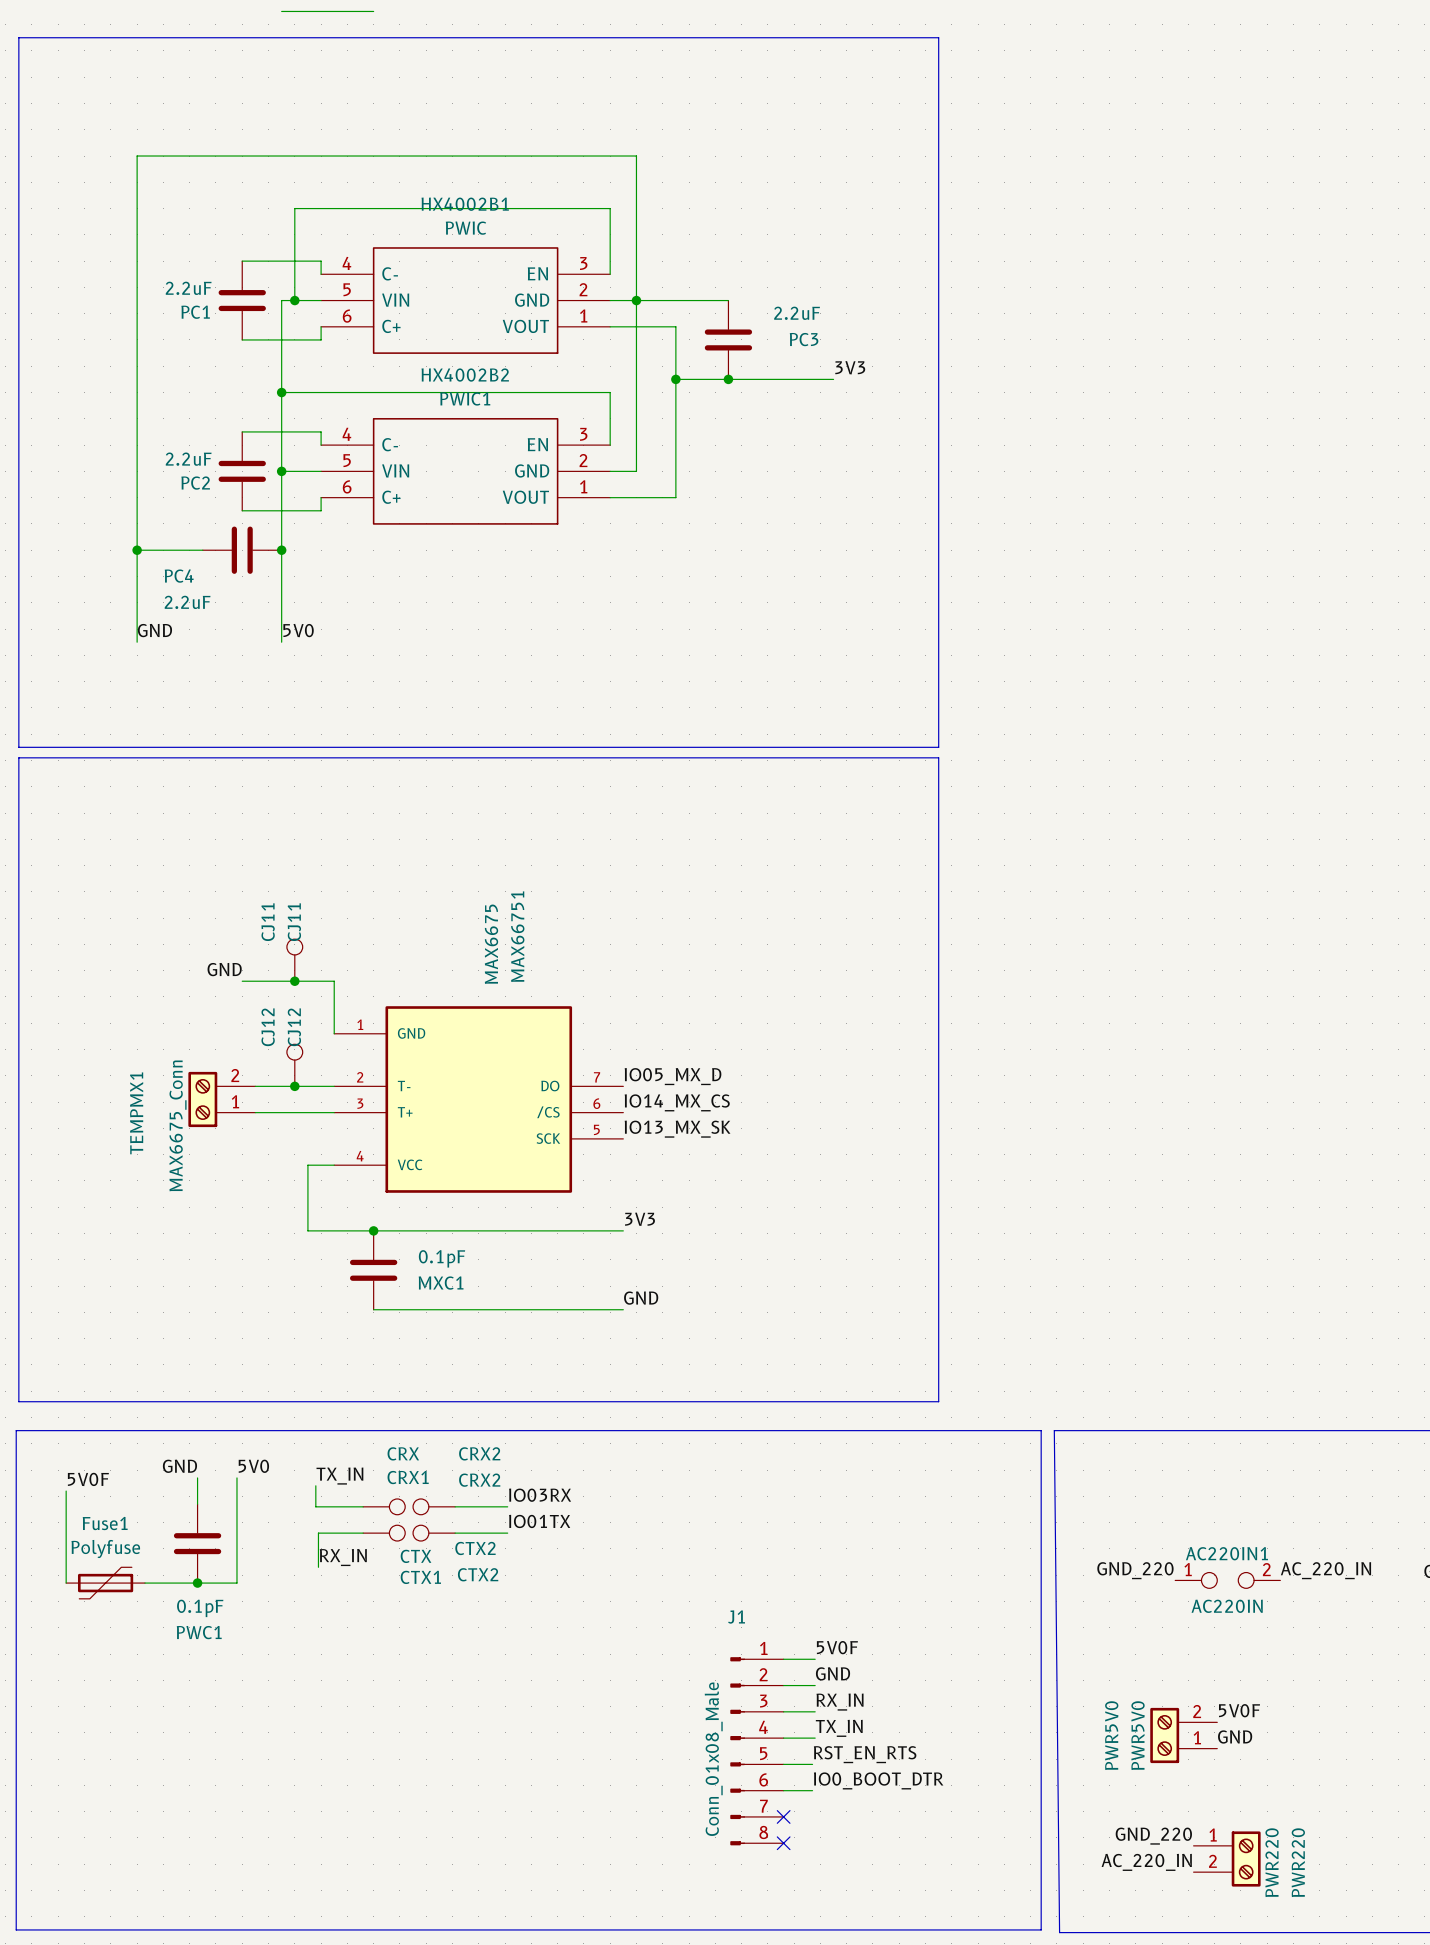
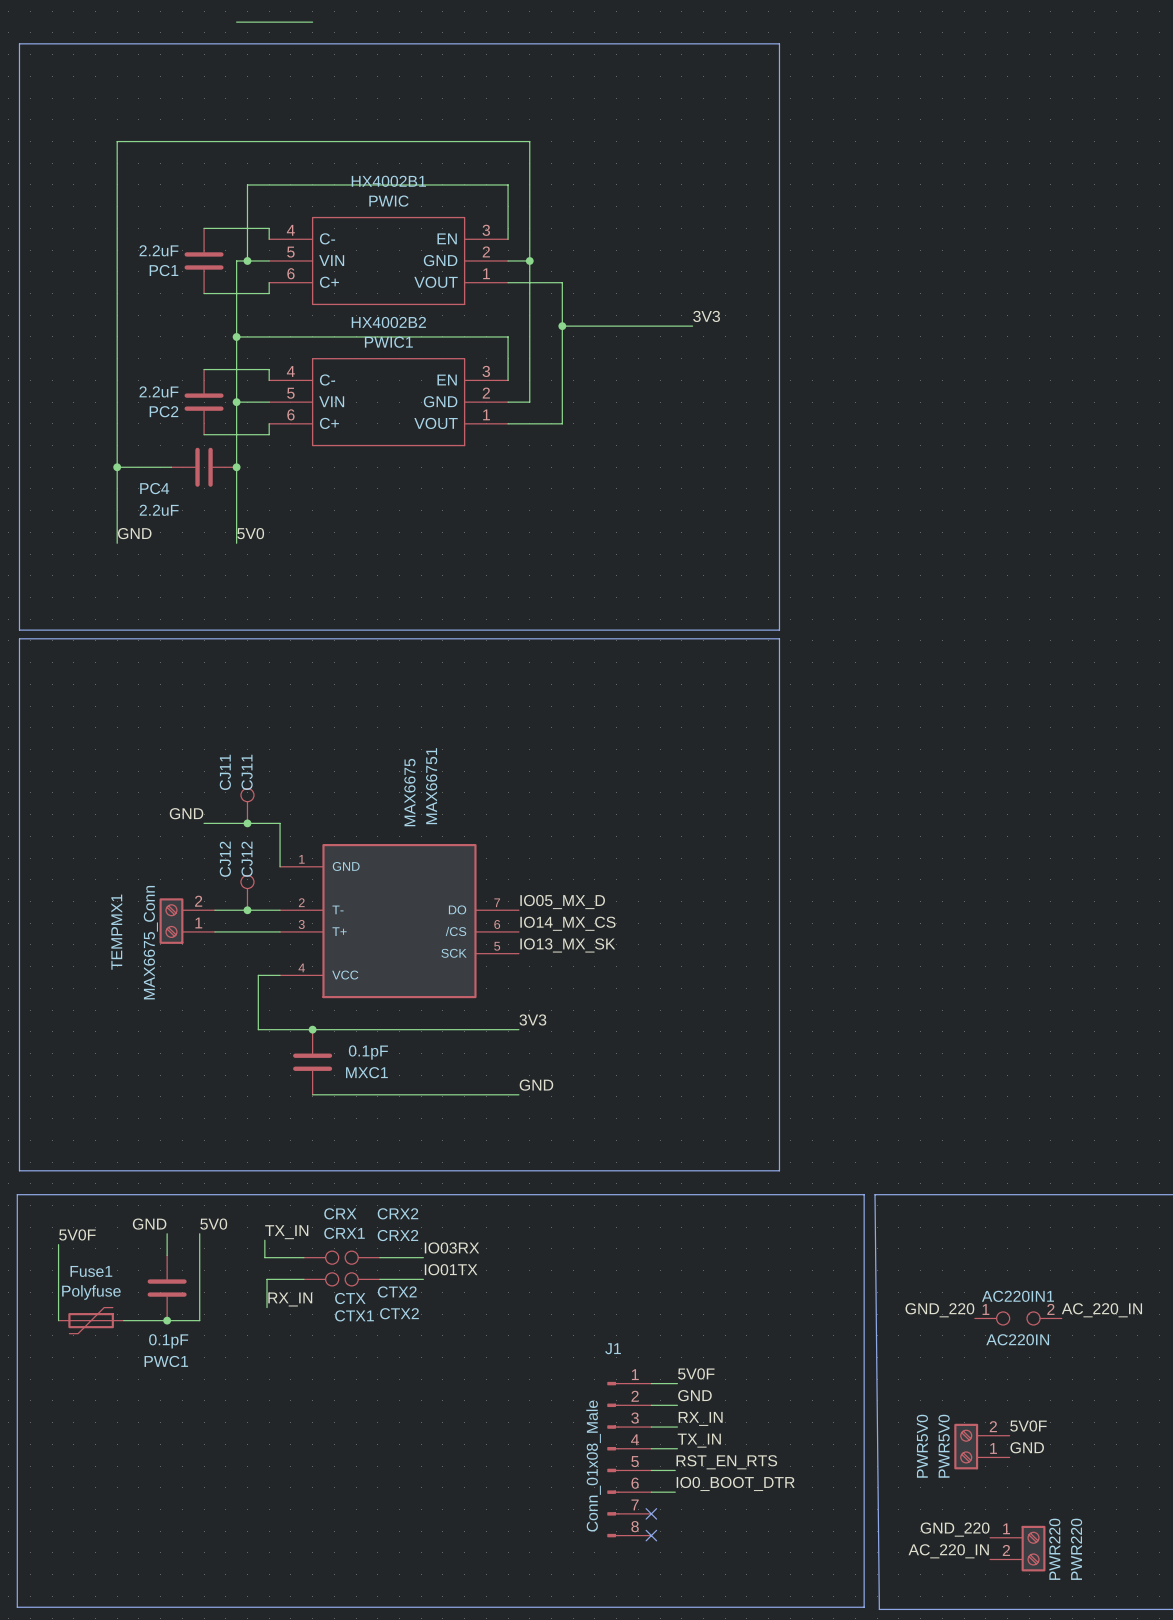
wire: (636, 300) (728, 300) -> none
PC3: 2.2uF (728, 339) -> none
junction: (728, 379) -> none

